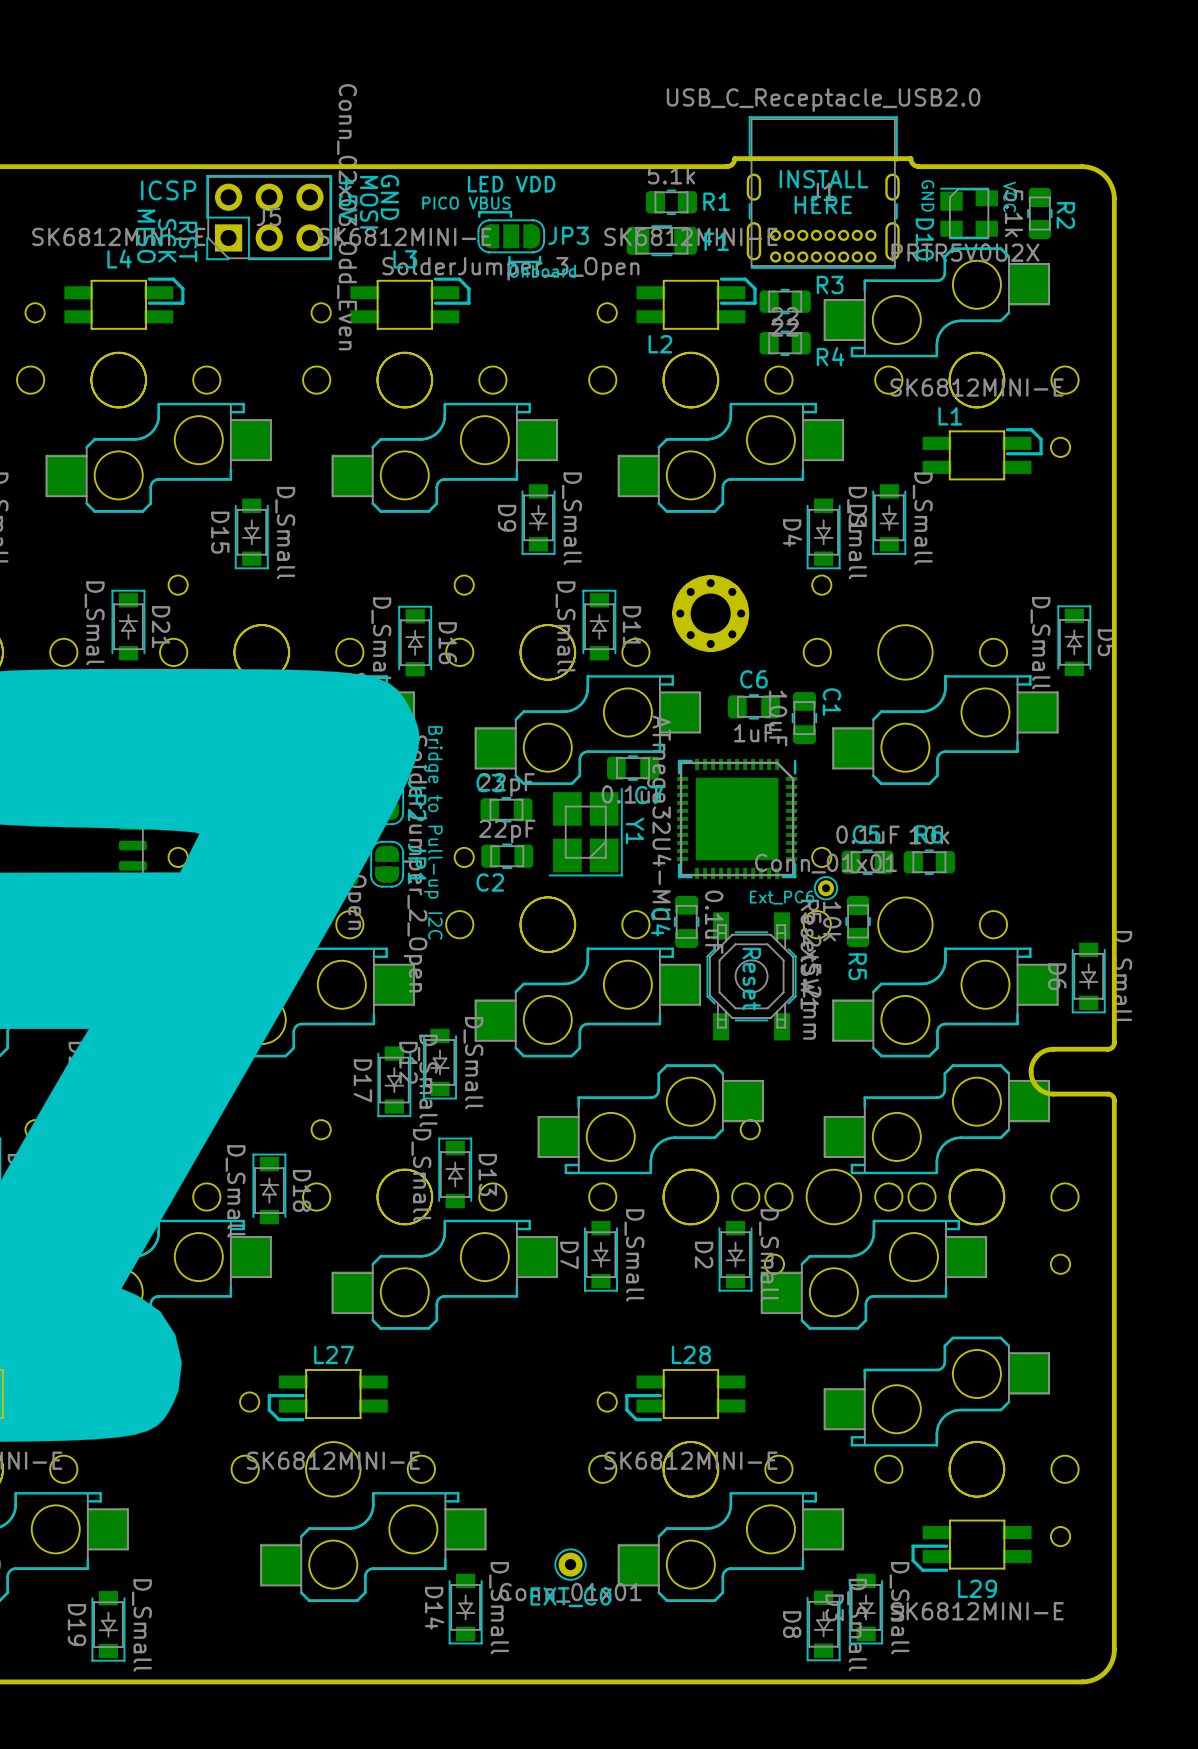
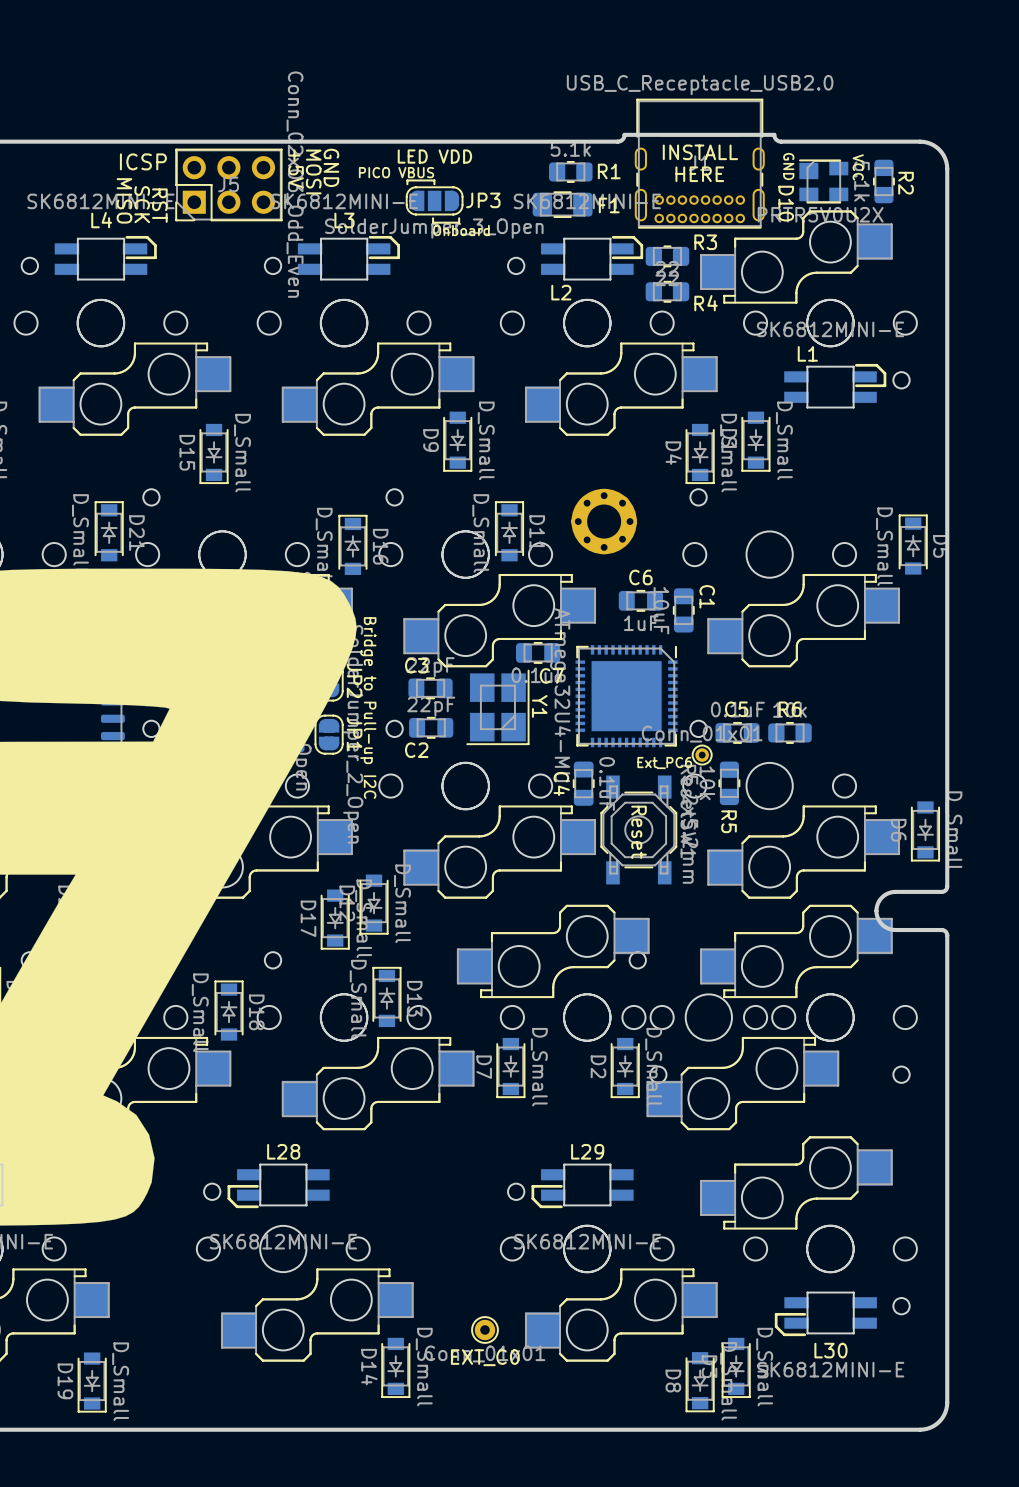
L27 name: L27 (334, 1354) -> L28 (283, 1151)
L28 name: L28 (691, 1354) -> L29 (587, 1151)
L29 name: L29 (977, 1588) -> L30 (830, 1350)

